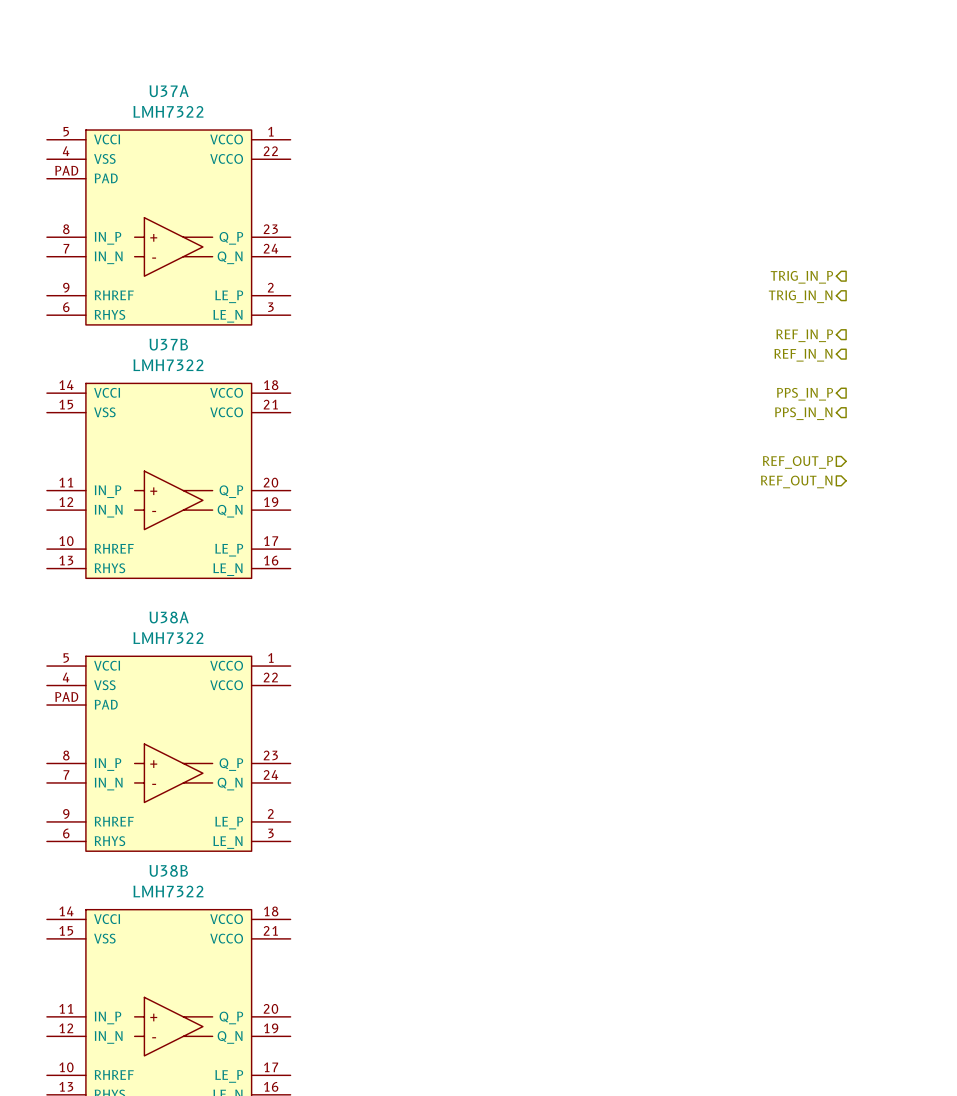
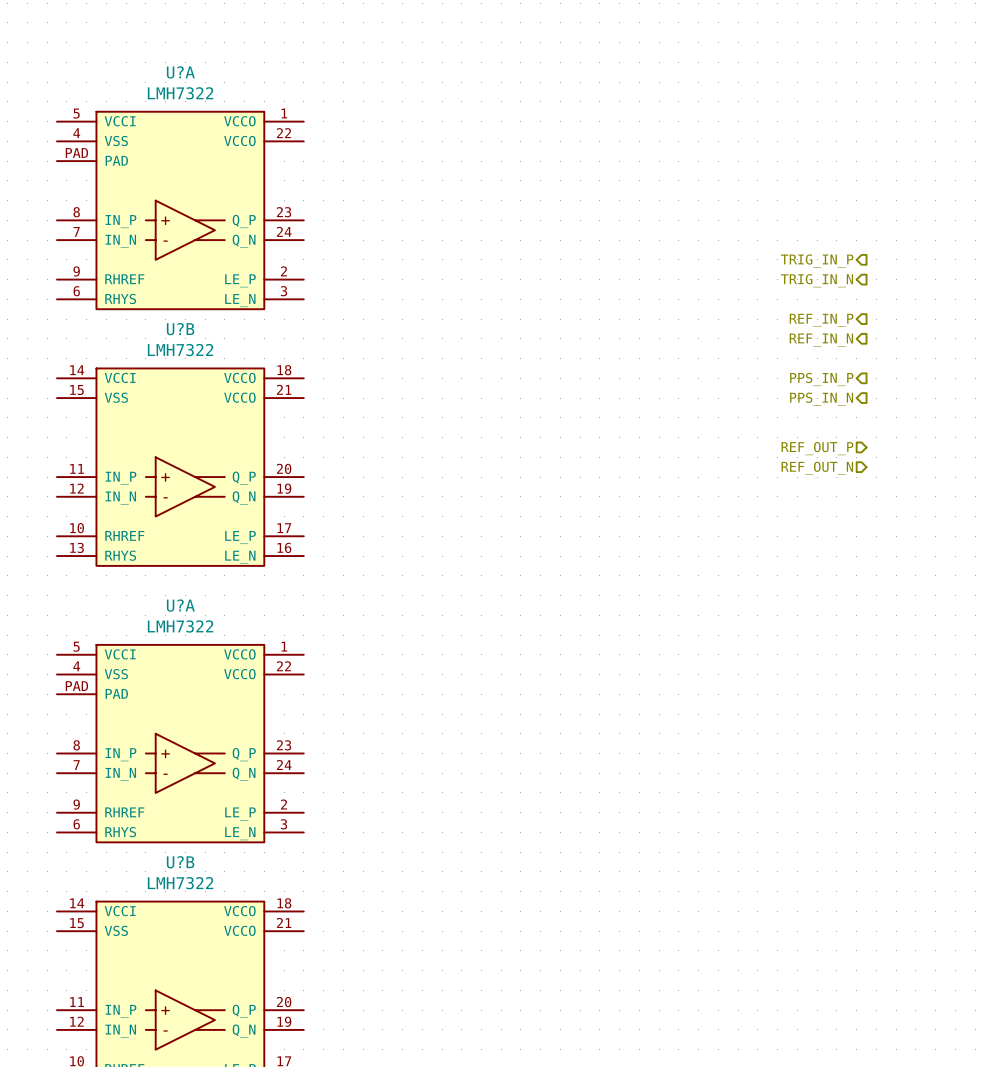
U37A name: U37A (169, 91) -> U?A (180, 72)
U37B name: U37B (168, 344) -> U?B (180, 329)
U38A name: U38A (169, 617) -> U?A (180, 605)
U38B name: U38B (168, 870) -> U?B (180, 862)

